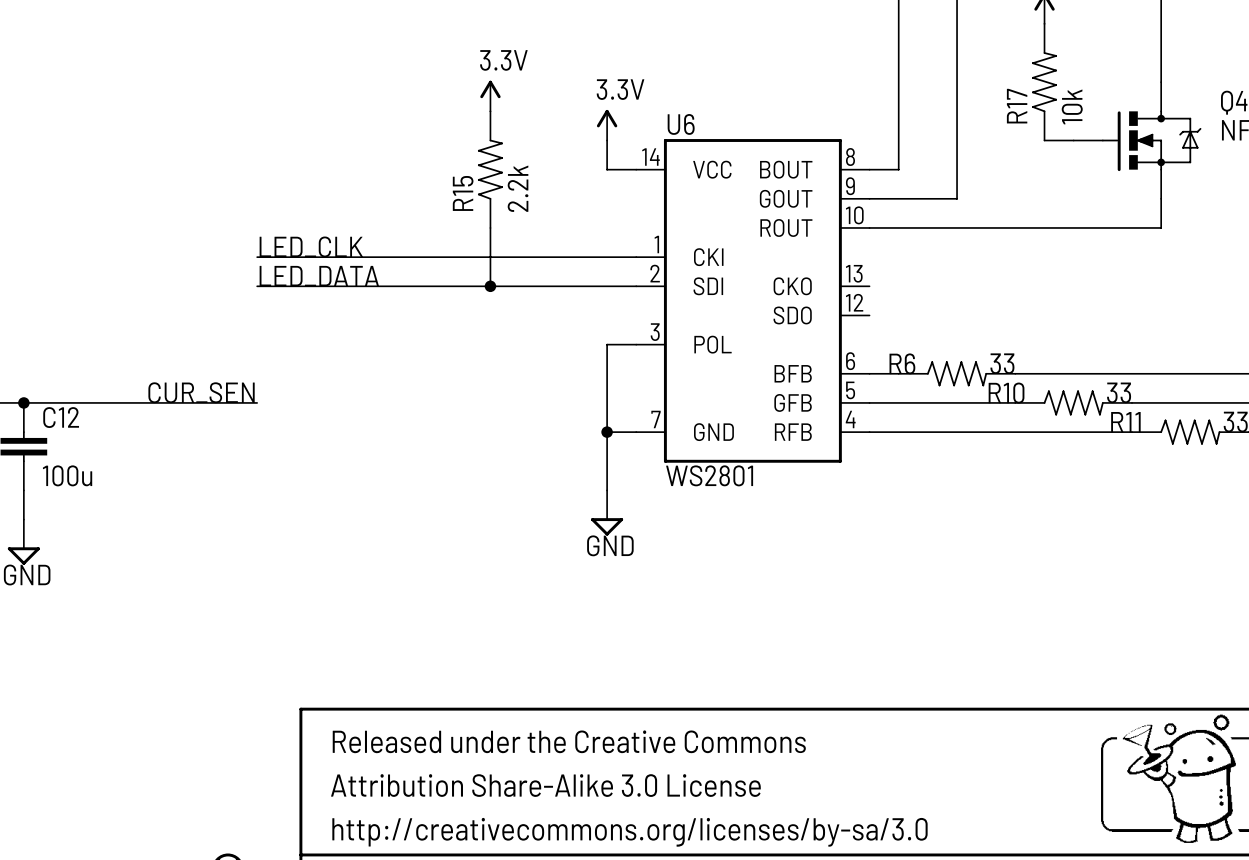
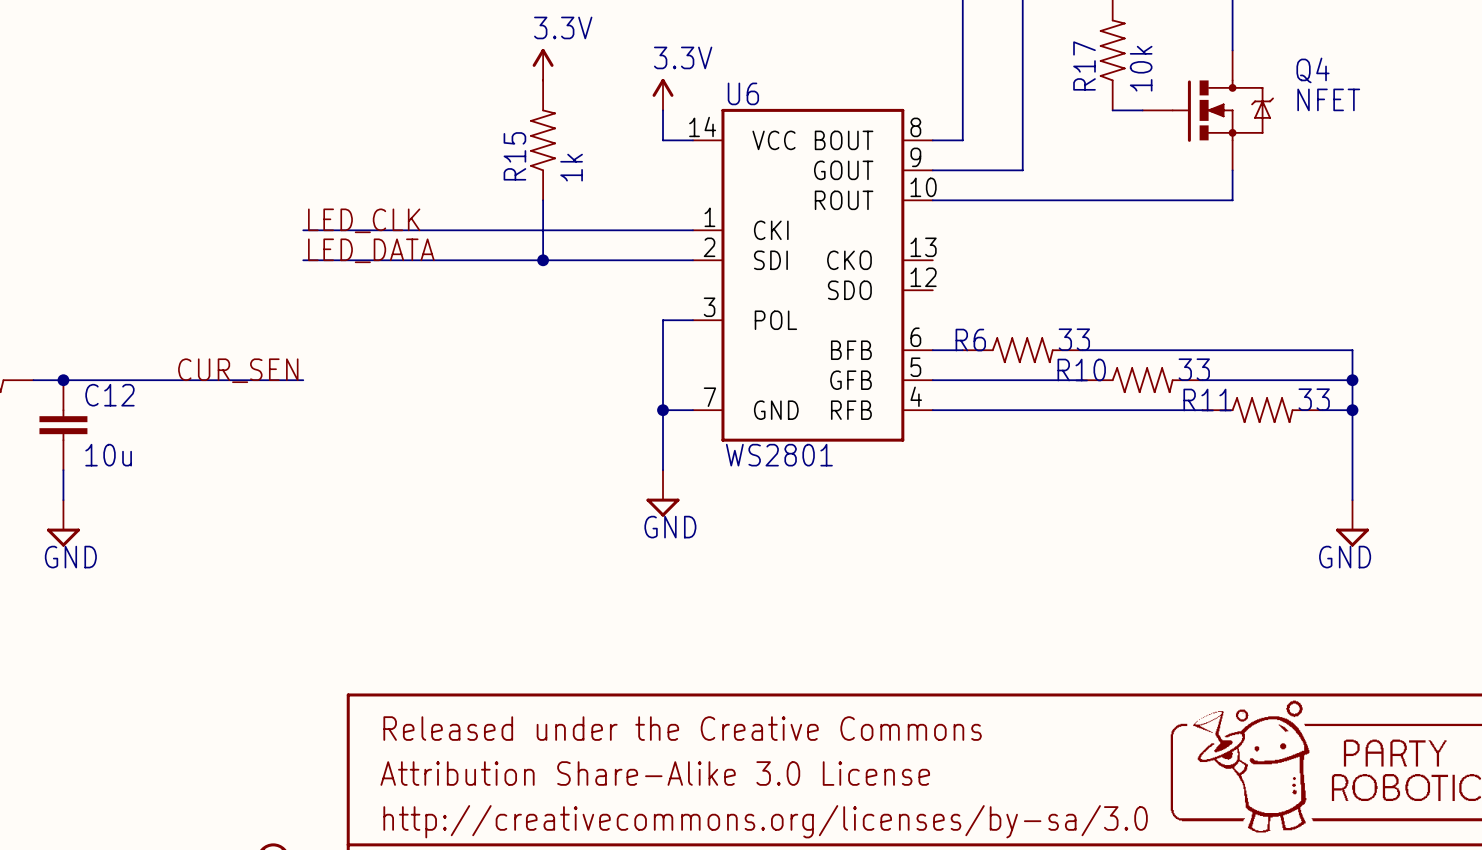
R15 value: 2.2k (518, 188) -> 1k (571, 167)
C12 value: 100u (67, 475) -> 10u (108, 455)

